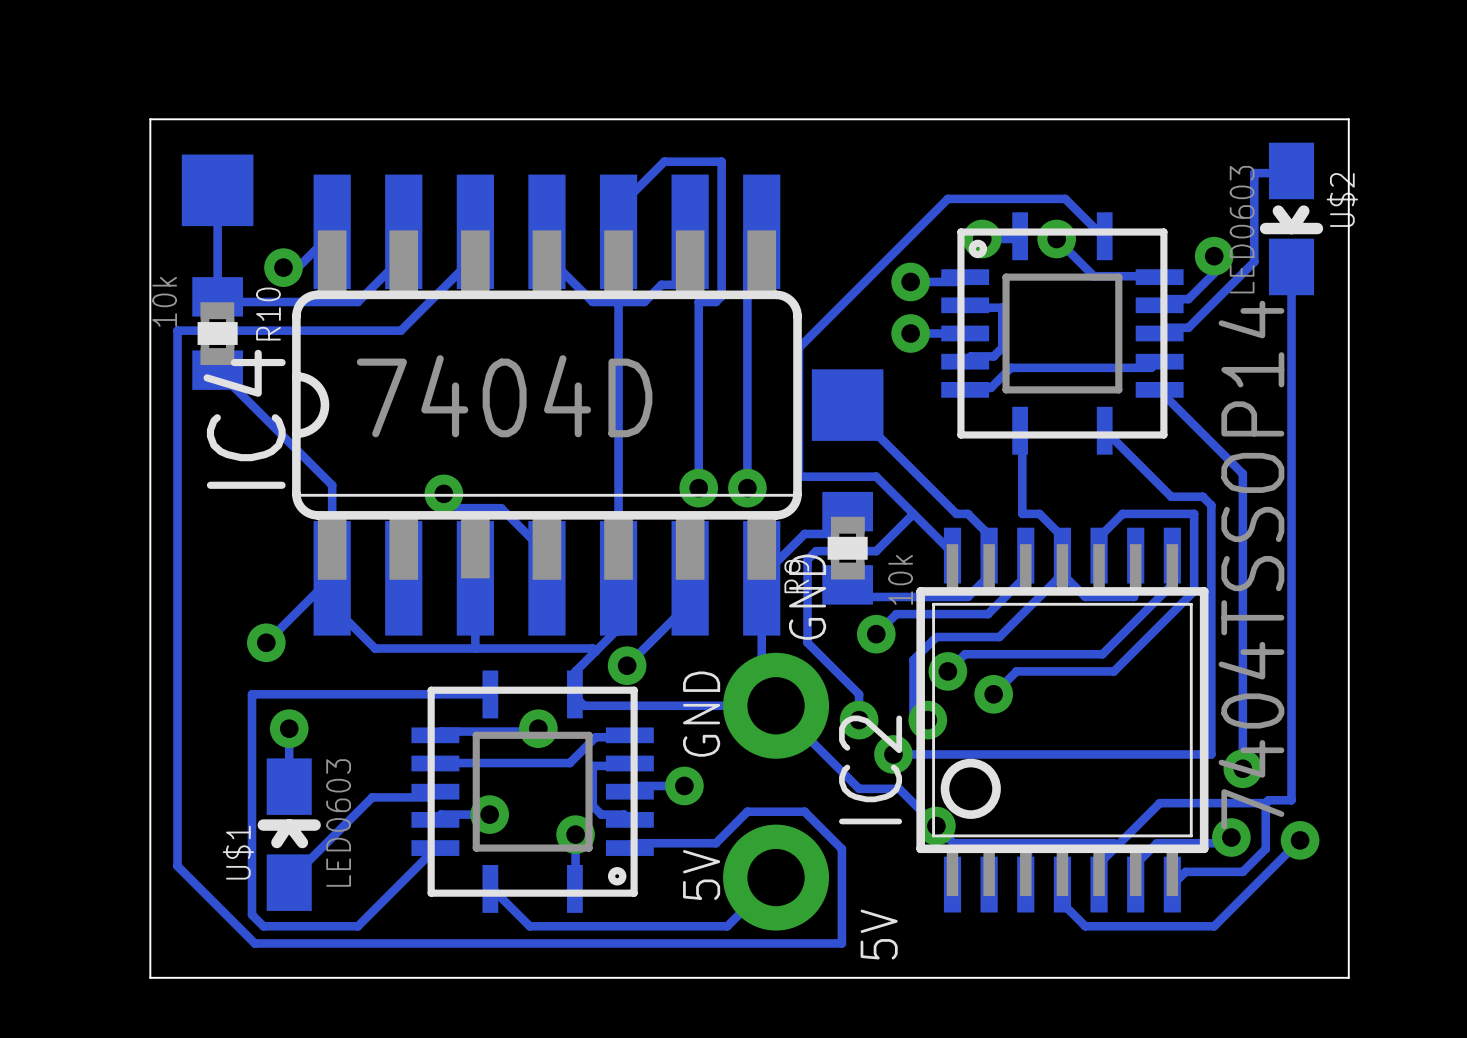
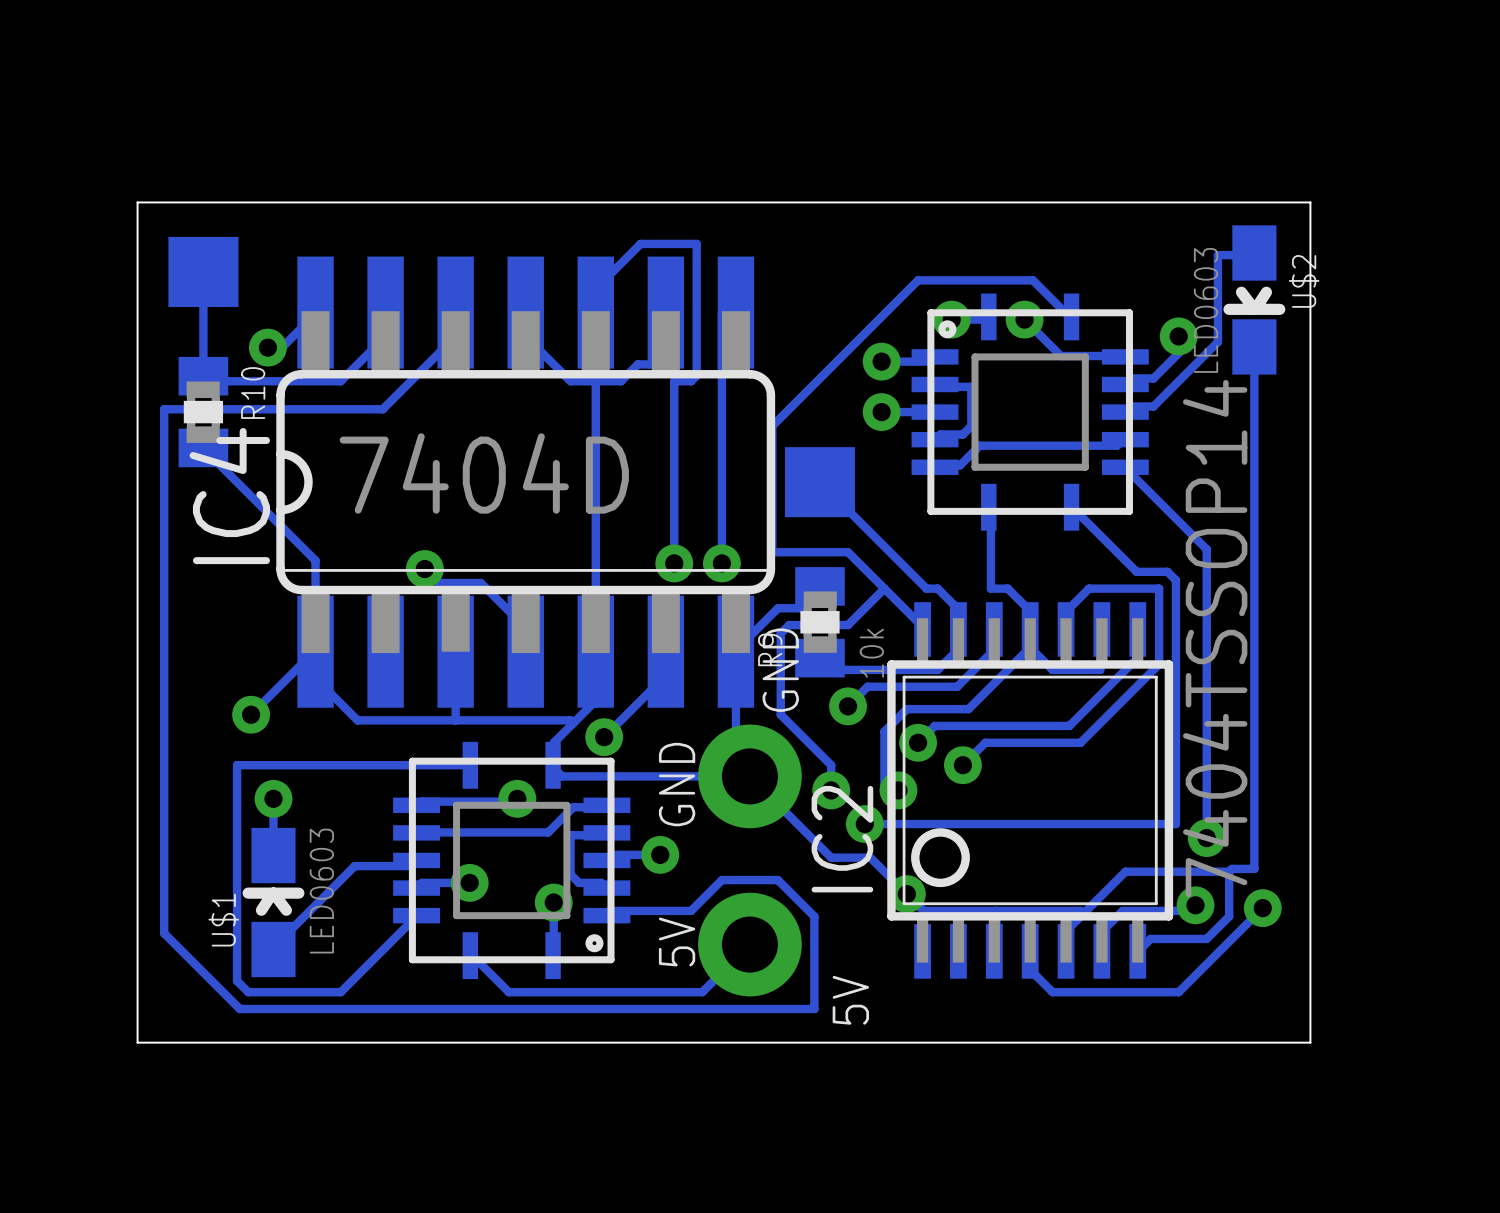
R10 value: 10k (164, 301) -> none

